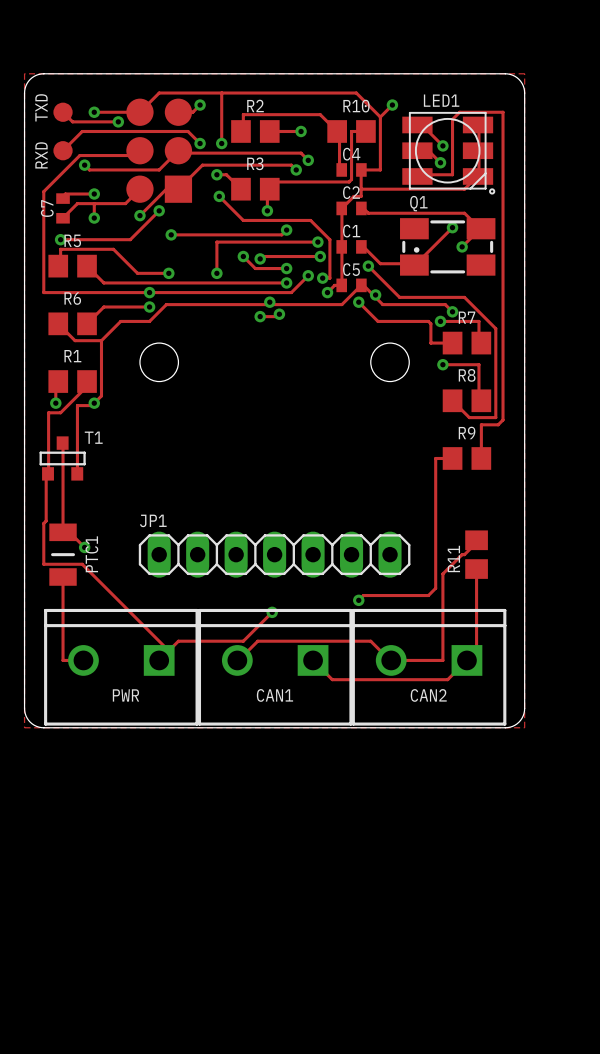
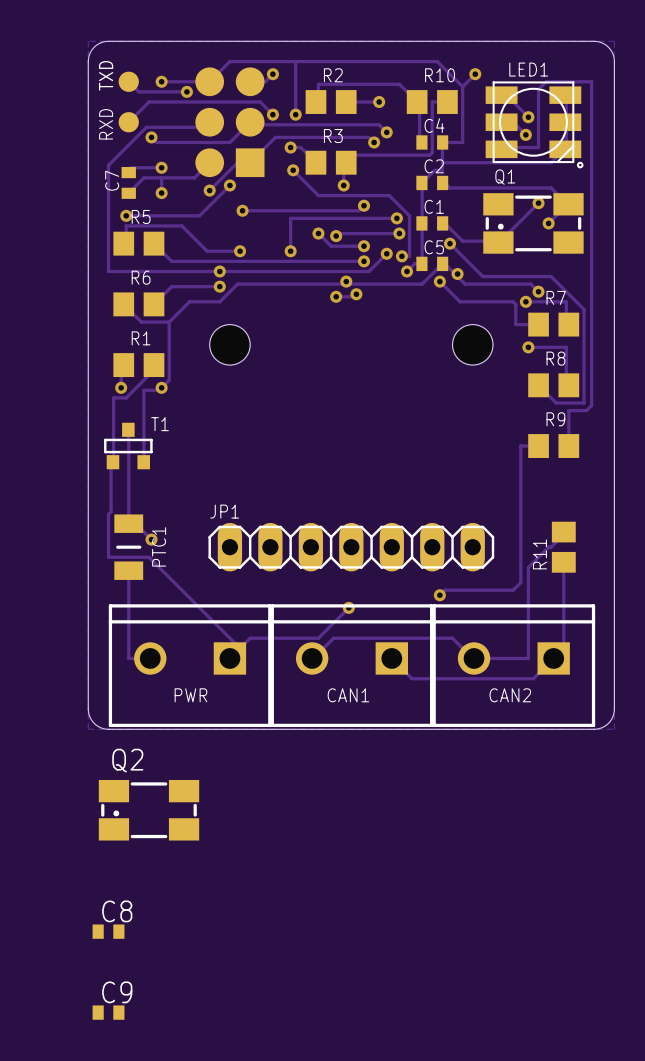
Q2: none -> (148, 810)
C8: none -> (108, 931)
C9: none -> (108, 1012)

